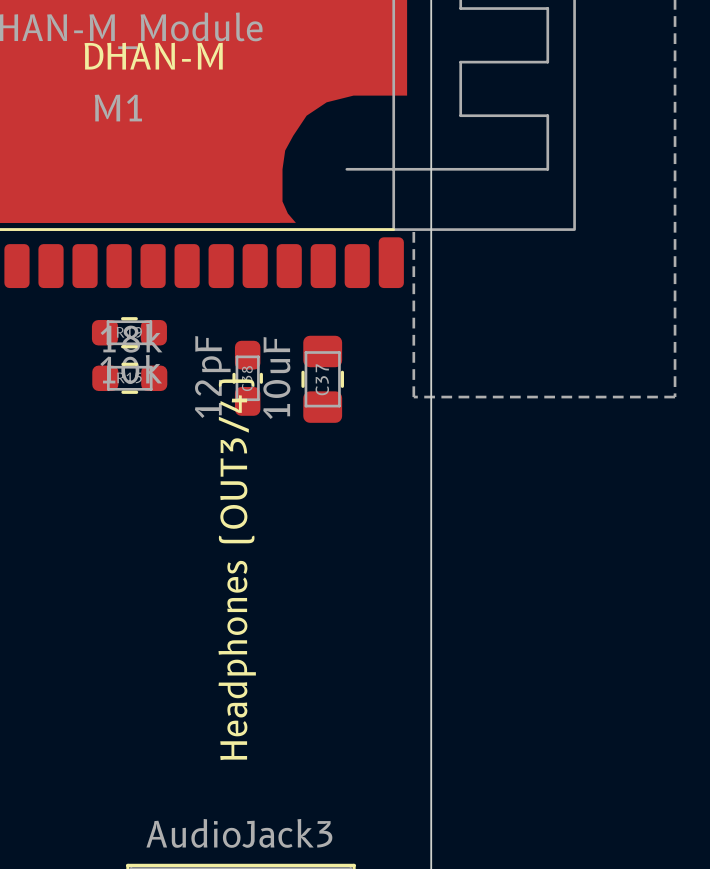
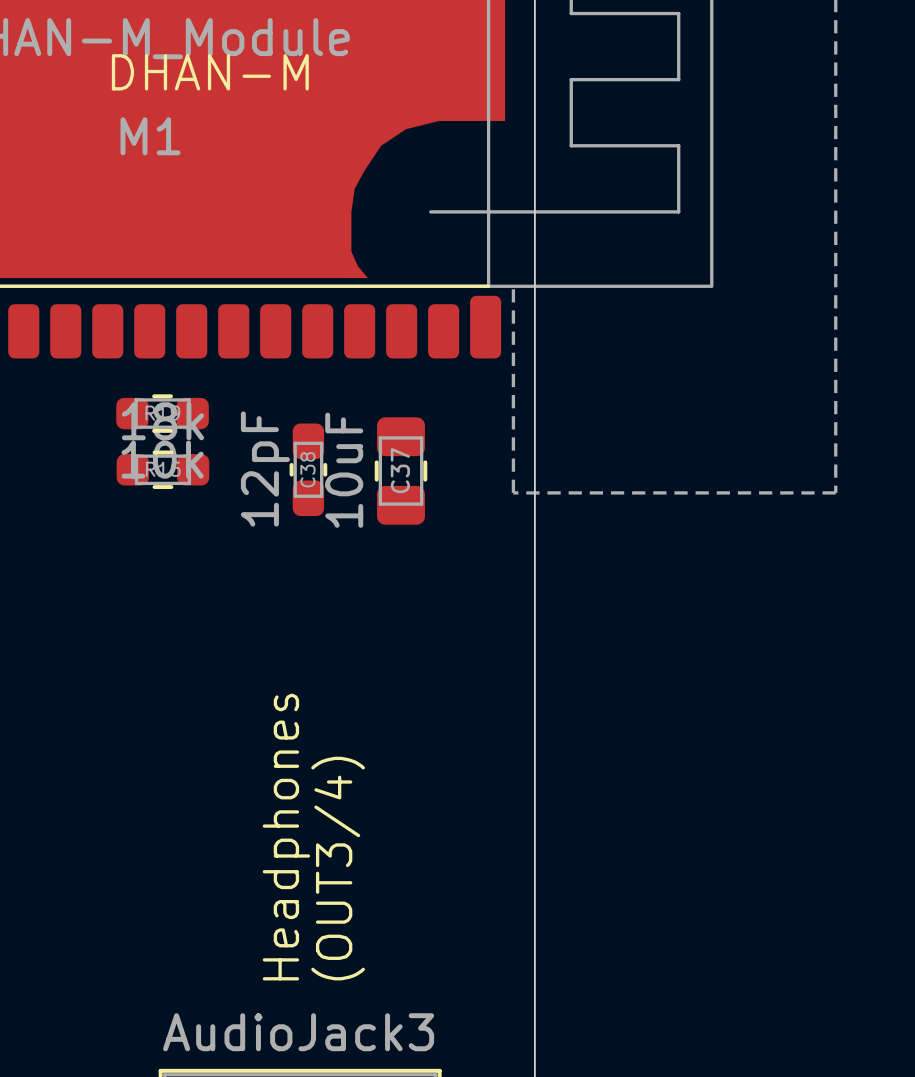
text: Headphones (OUT3/4) (237, 569) -> Headphones (286, 837)
text: none -> (OUT3/4) (338, 868)

